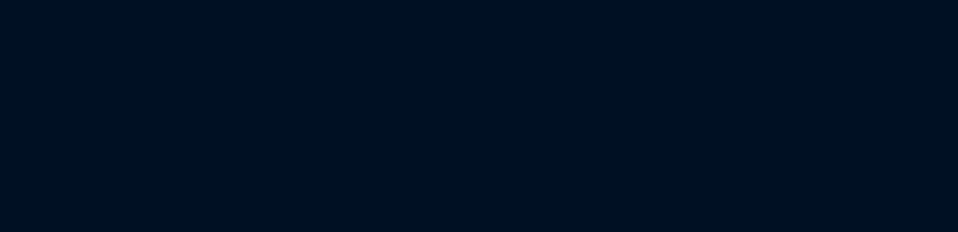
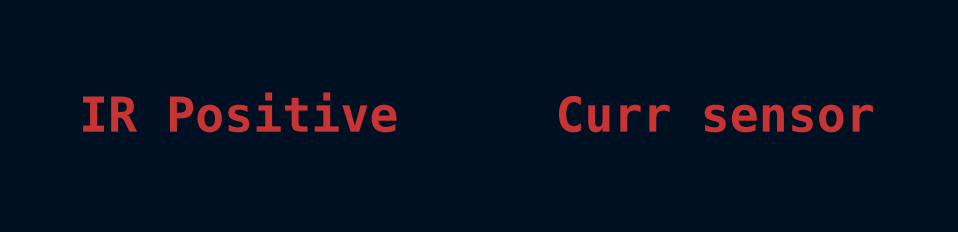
text: none -> IR Positive (239, 112)
text: none -> Curr sensor (715, 114)

